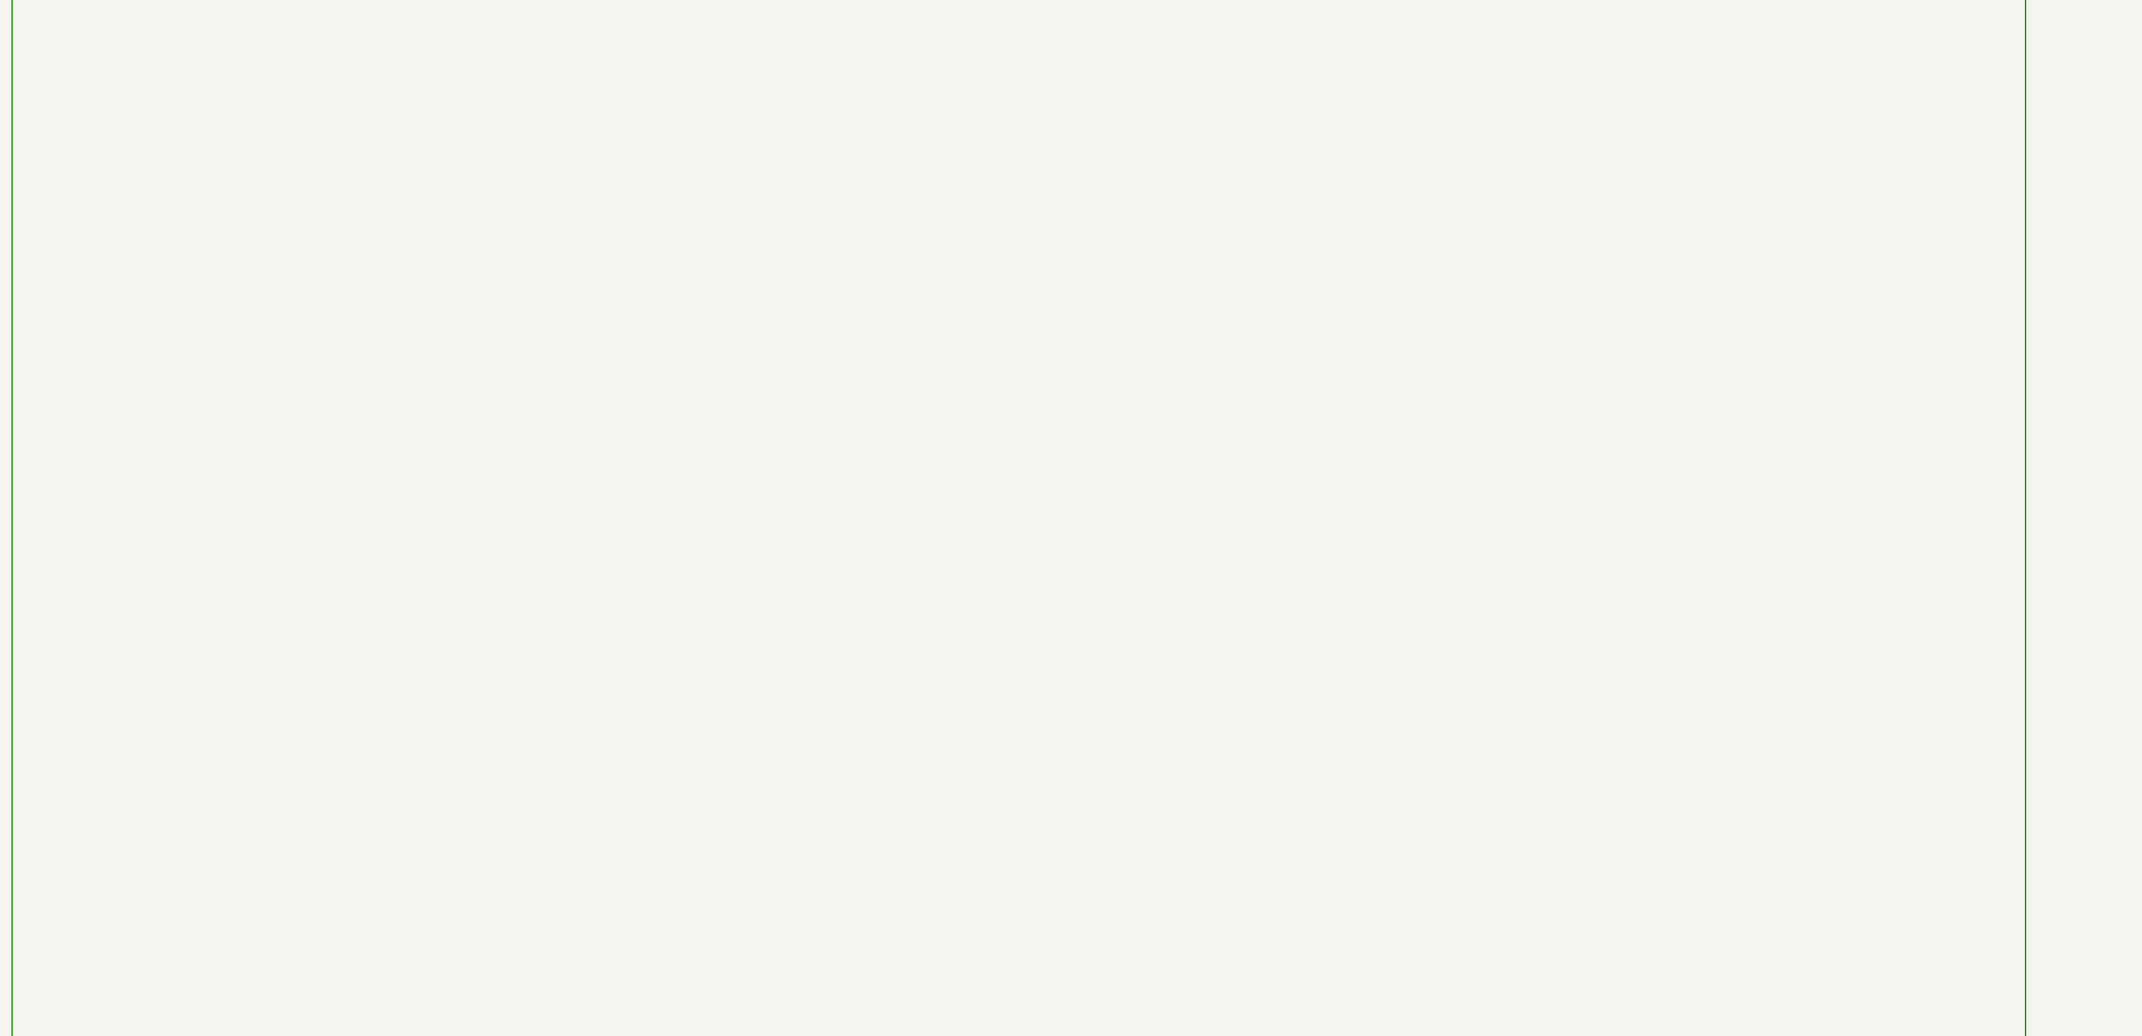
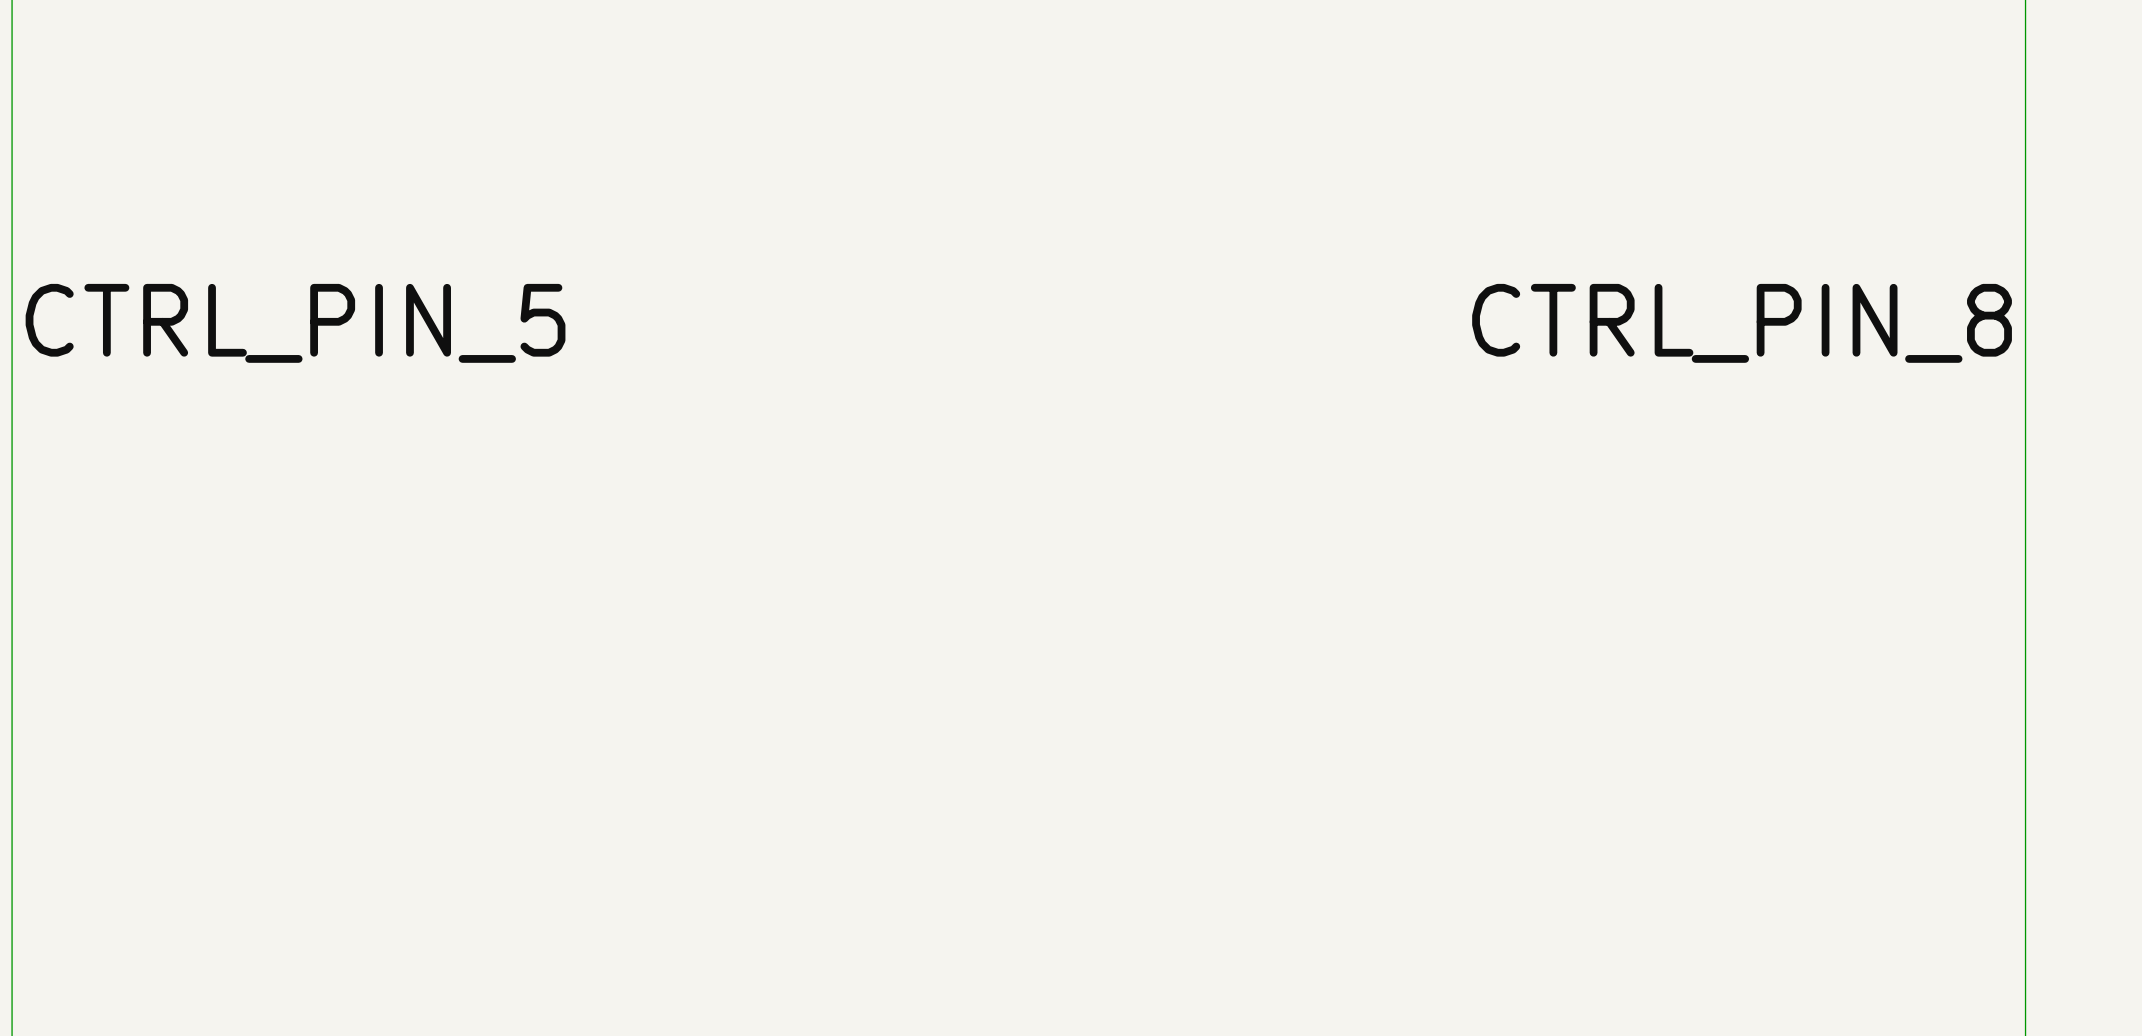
label: none -> CTRL_PIN_5 (295, 323)
label: none -> CTRL_PIN_8 (1742, 323)

